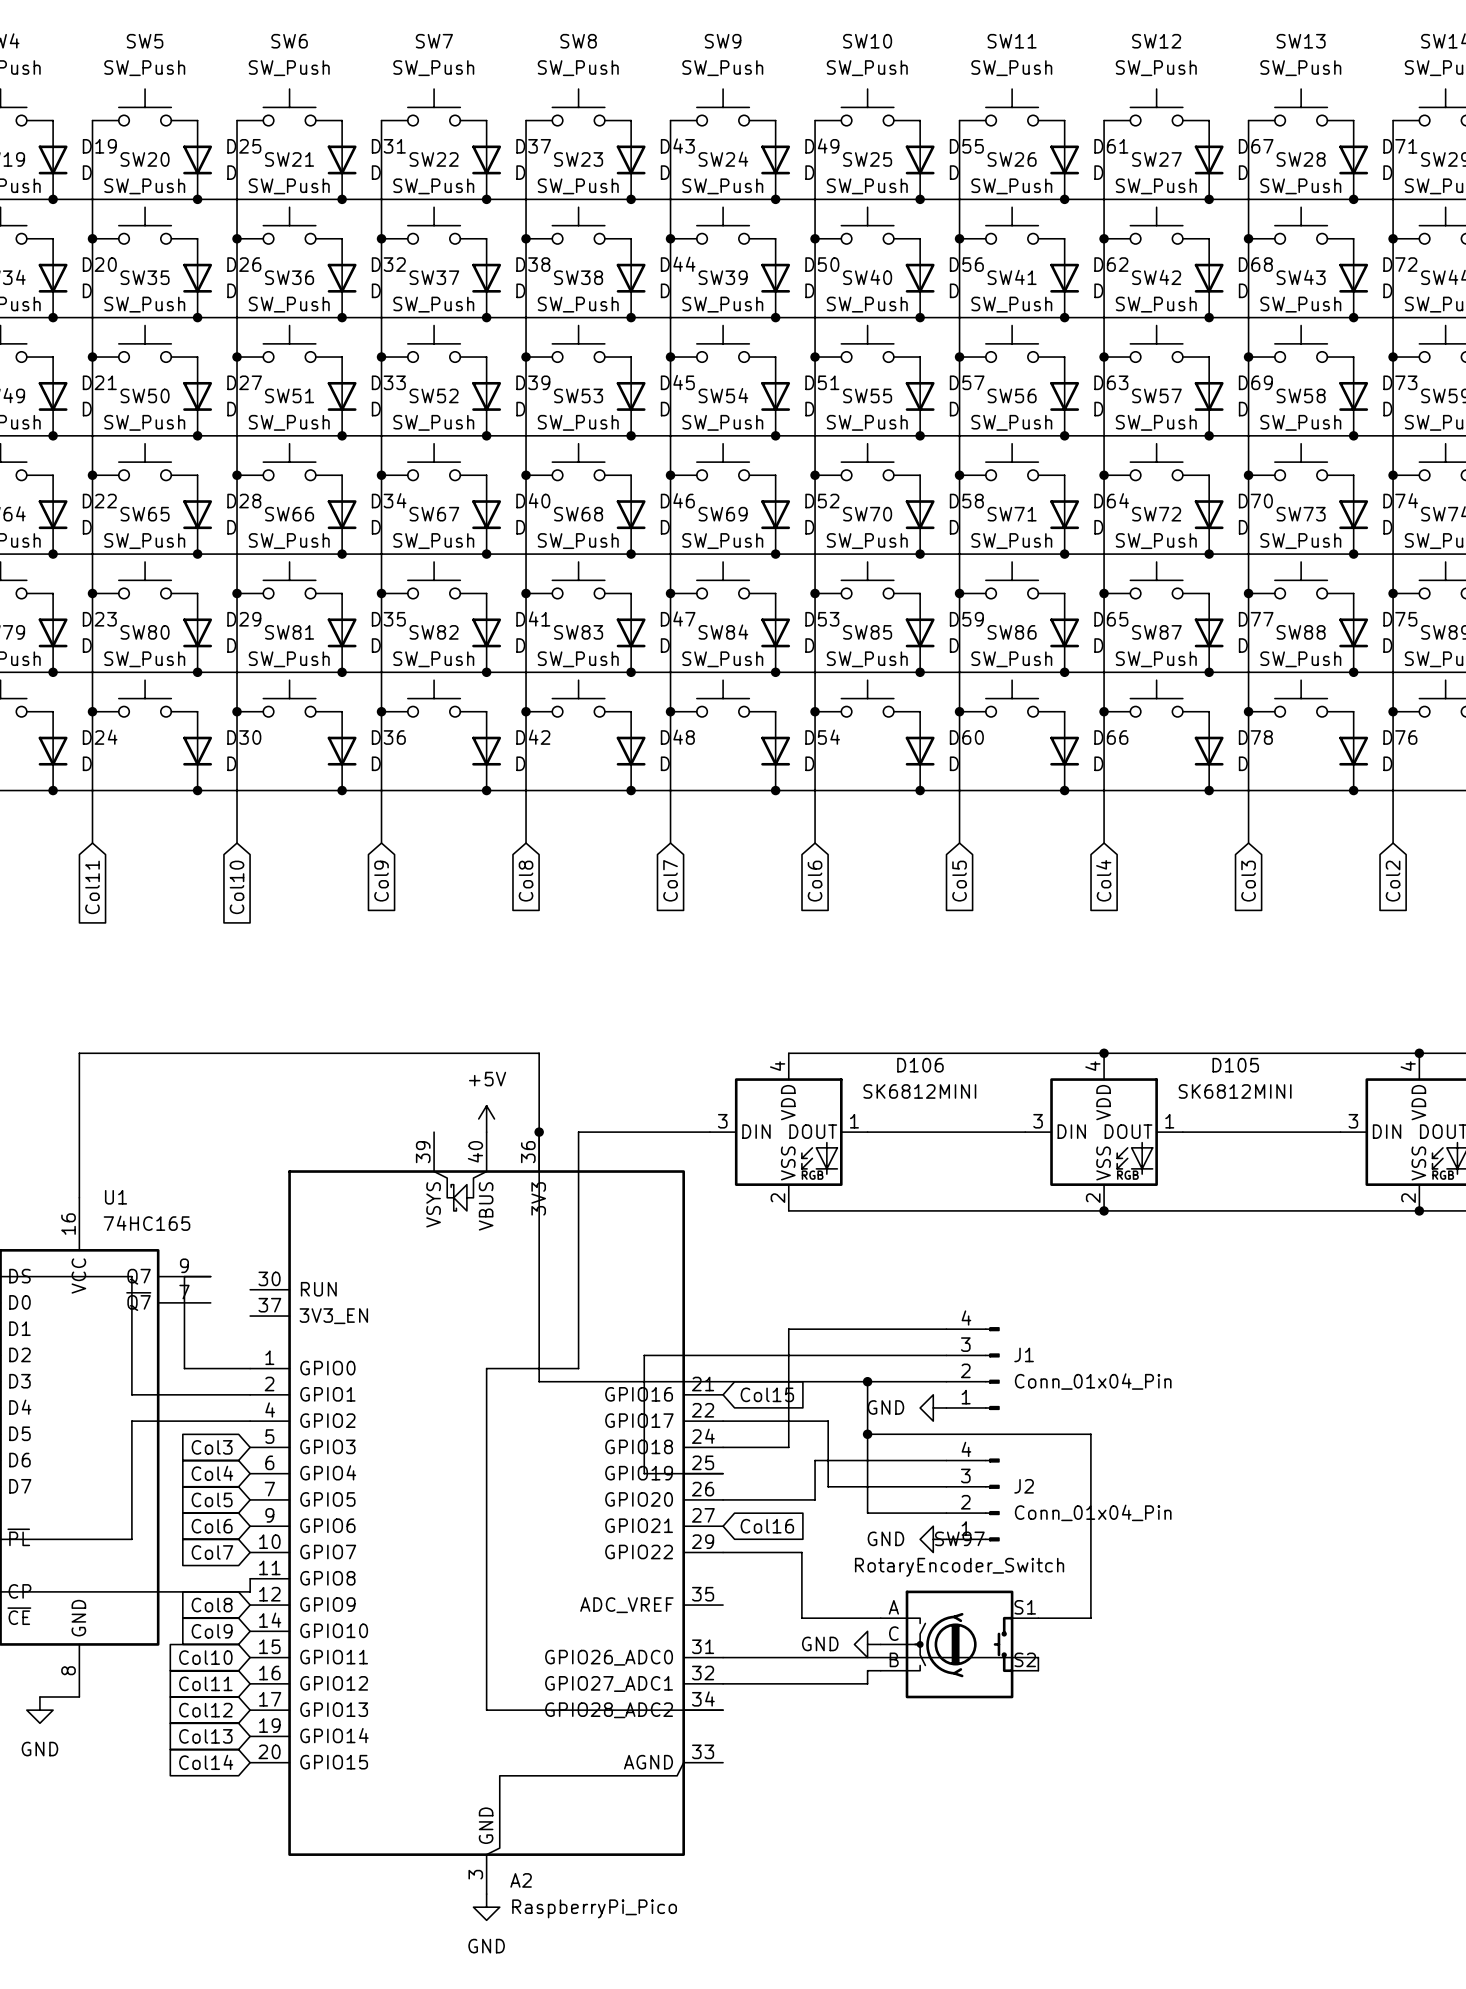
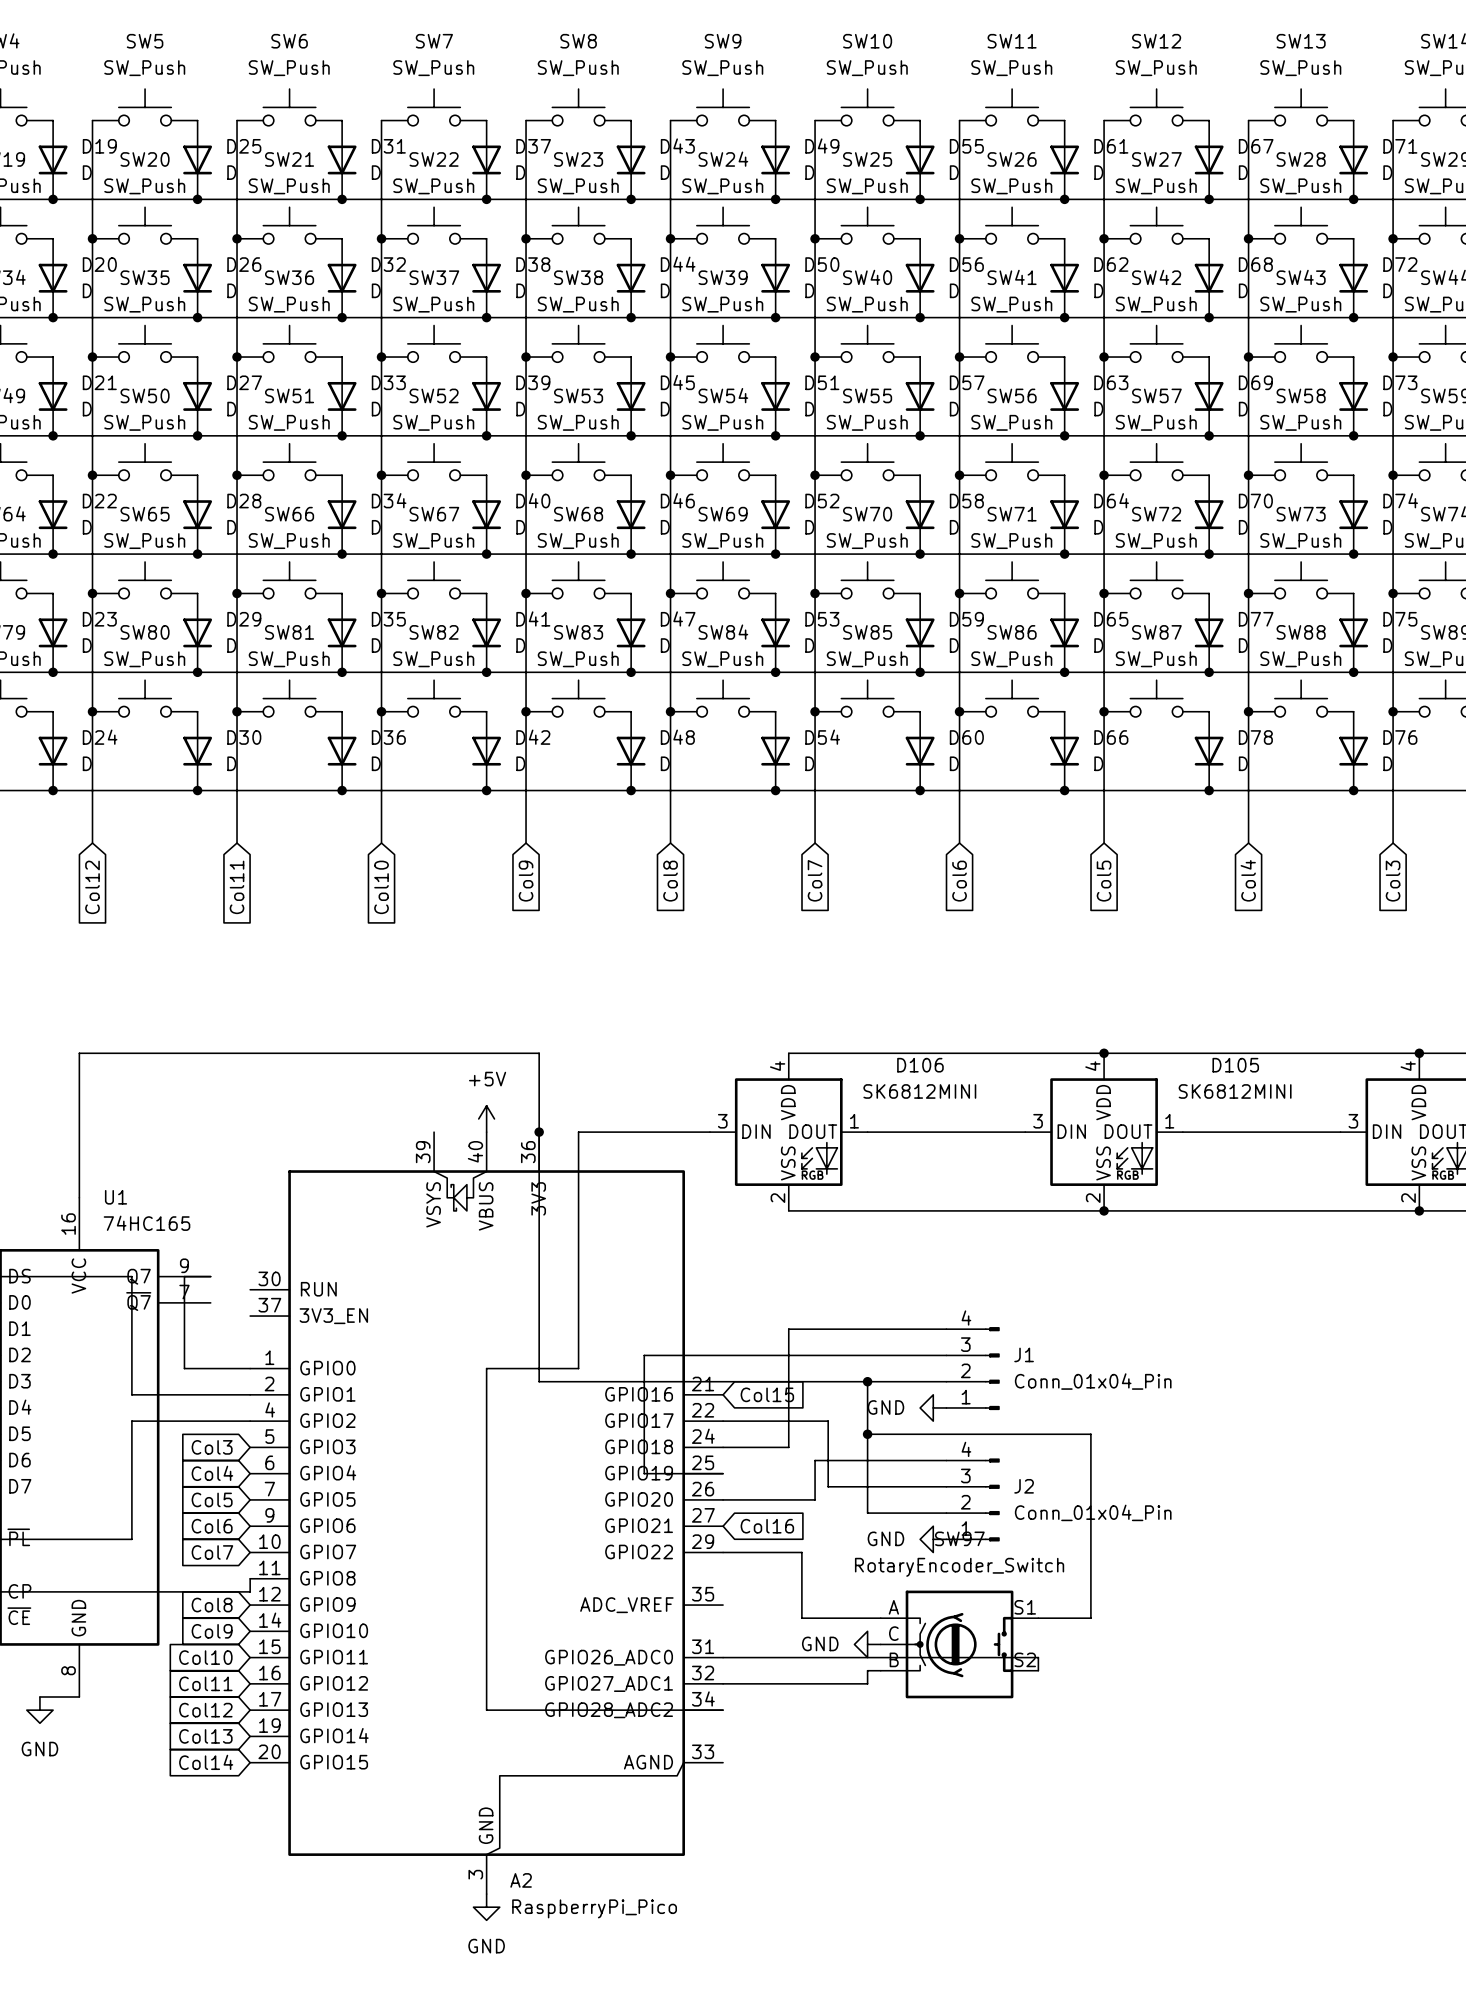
global label: Col7 (670, 880) -> Col8 (670, 881)
global label: Col4 (1103, 880) -> Col5 (1104, 881)
global label: Col9 (381, 881) -> Col10 (381, 887)
global label: Col8 (526, 881) -> Col9 (526, 881)
global label: Col6 (815, 881) -> Col7 (815, 880)
global label: Col5 (959, 881) -> Col6 (959, 881)
global label: Col3 (1248, 881) -> Col4 (1248, 880)
global label: Col2 (1393, 881) -> Col3 (1393, 881)
global label: Col11 (92, 887) -> Col12 (92, 887)
global label: Col10 (237, 887) -> Col11 (237, 887)

